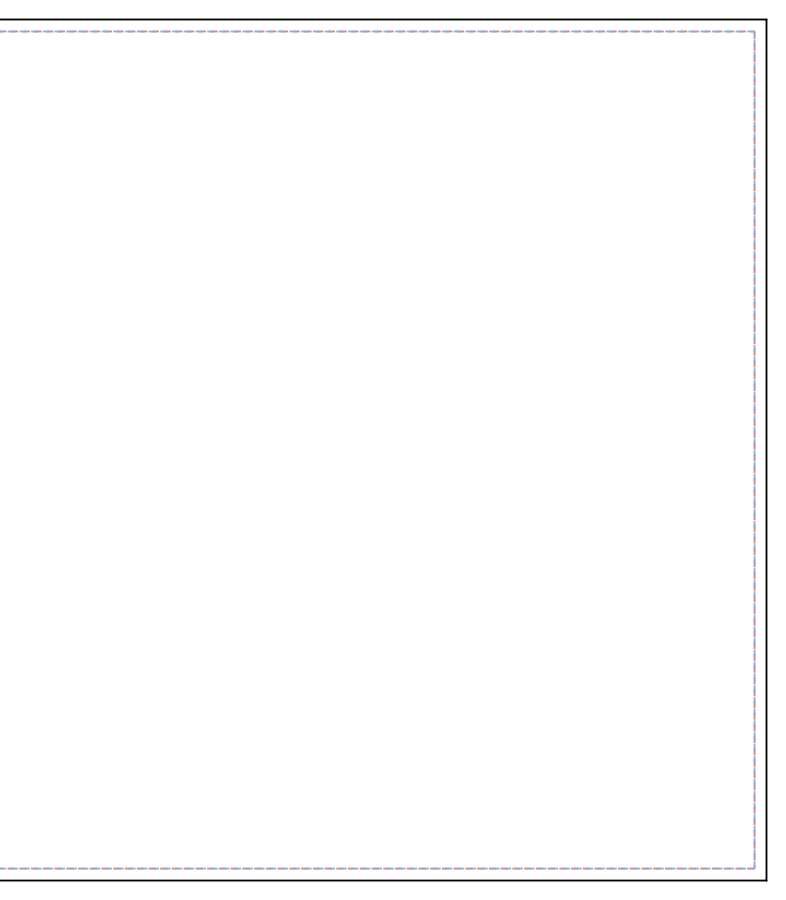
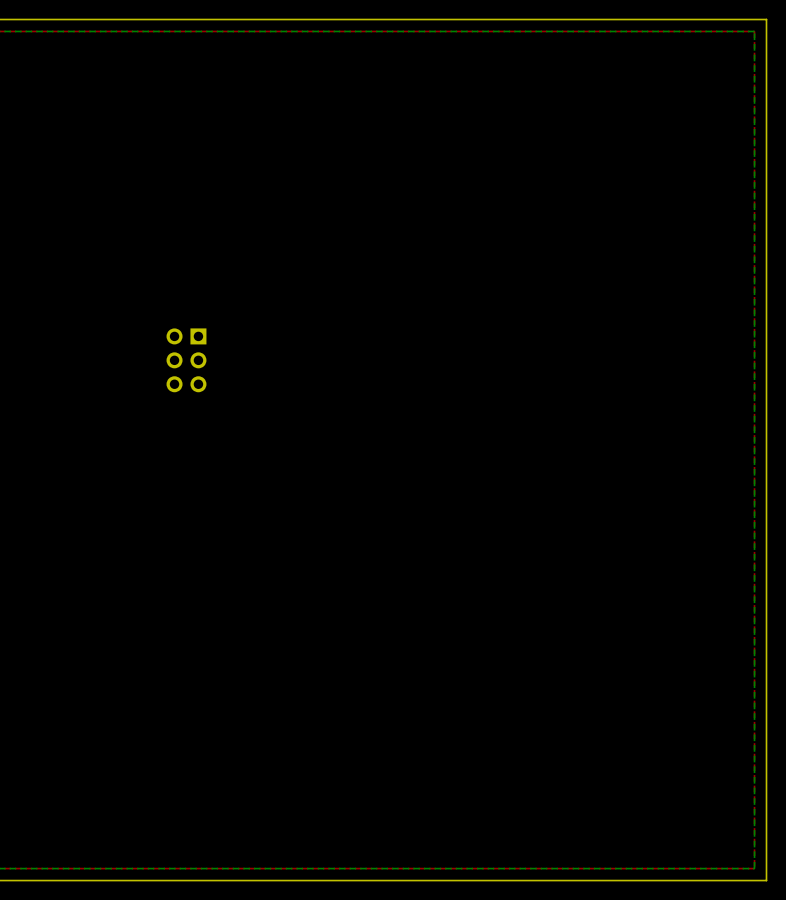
part: none -> (186, 360)

